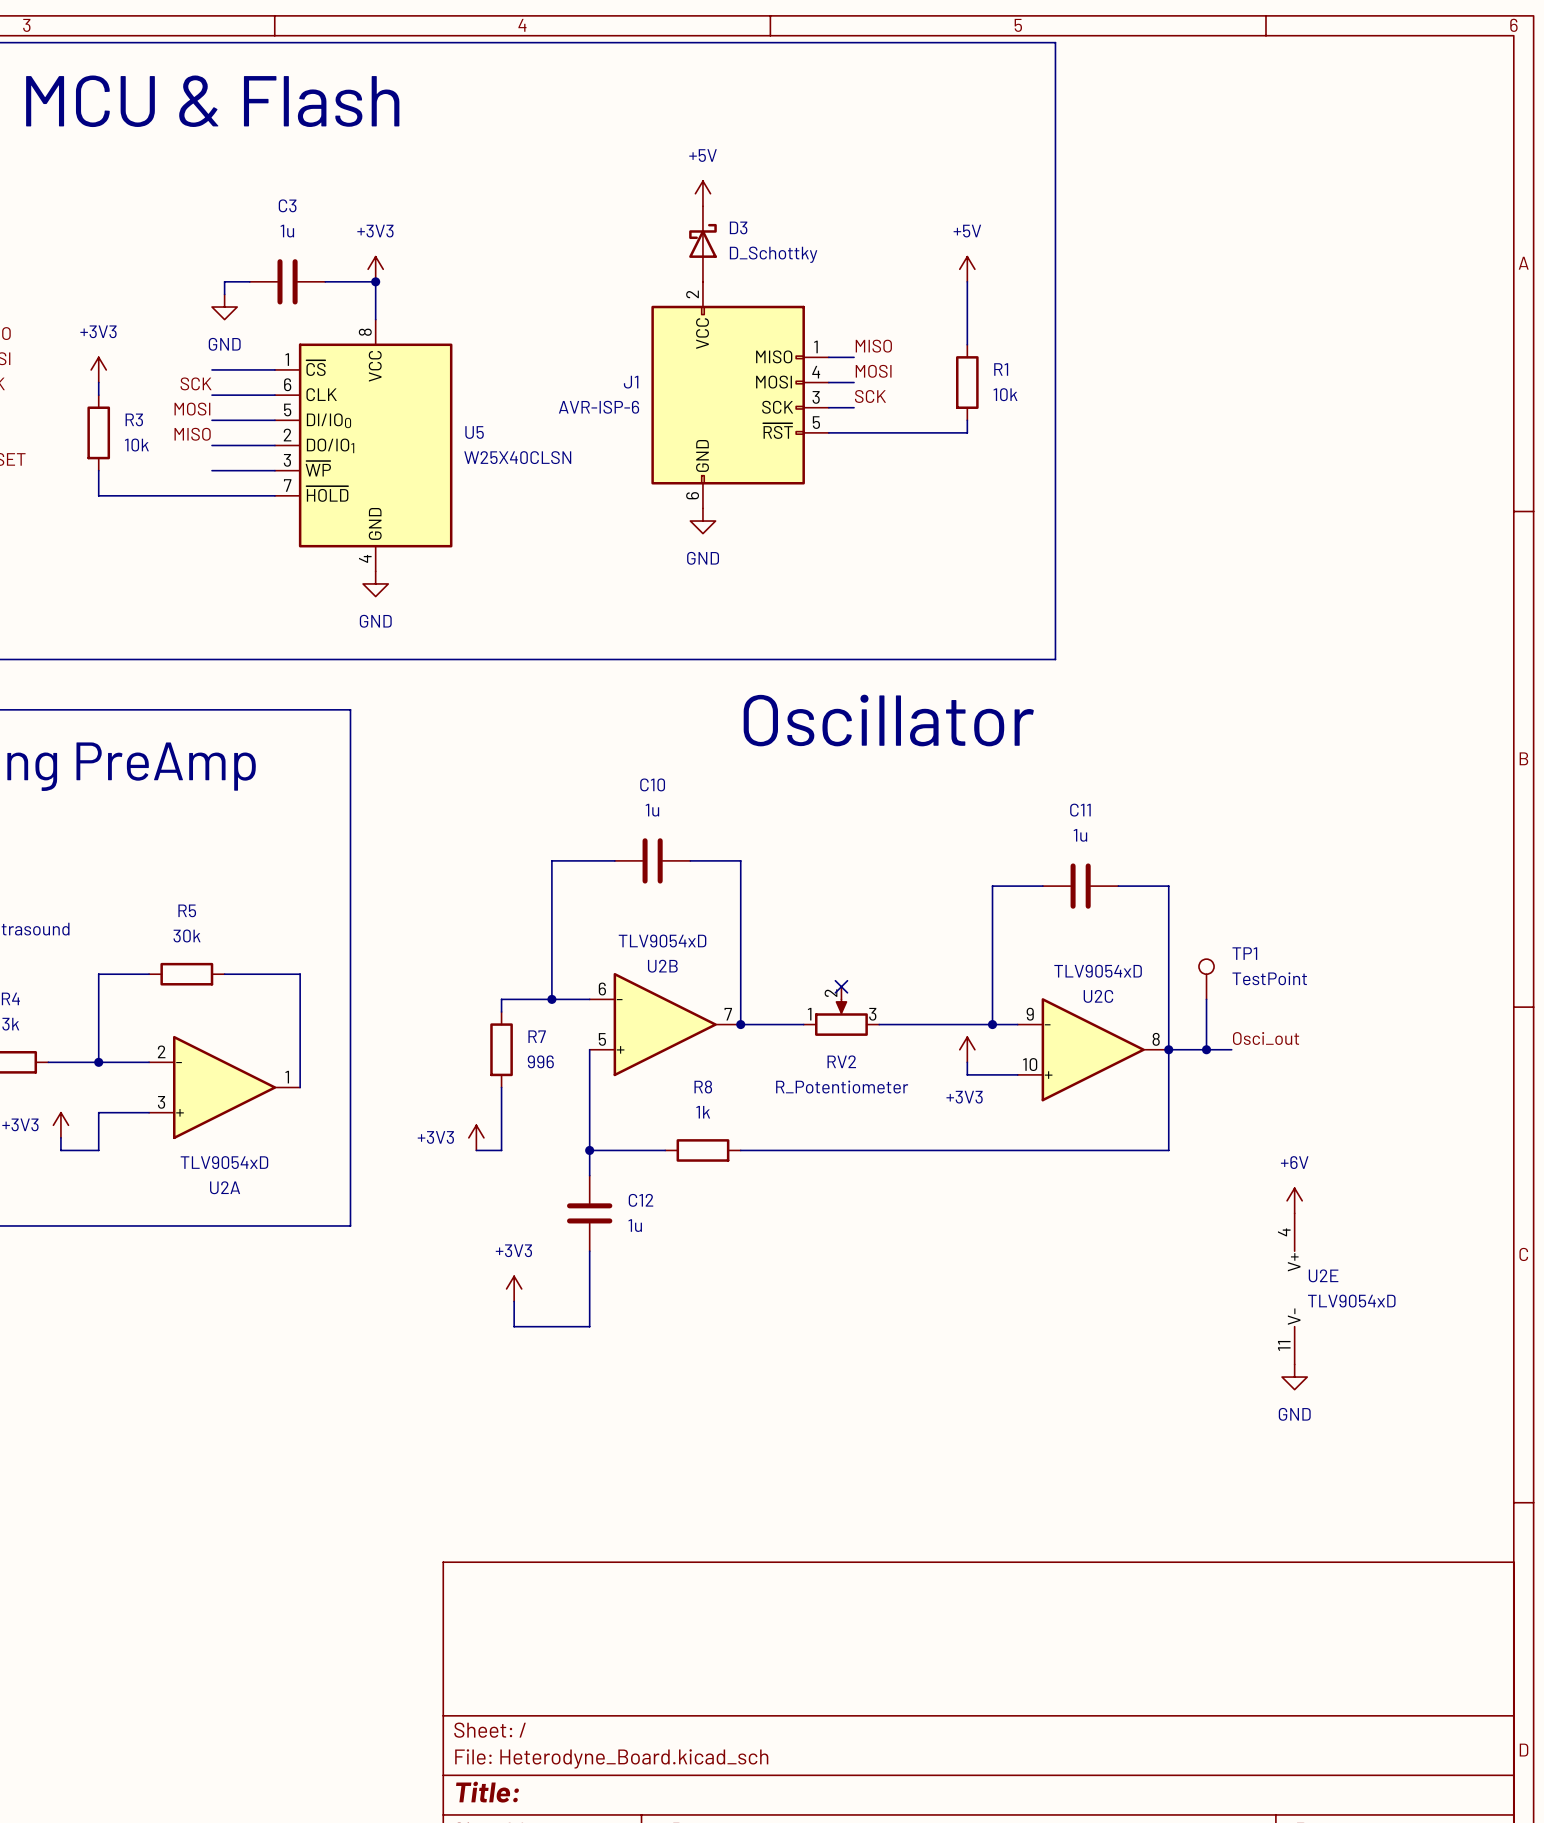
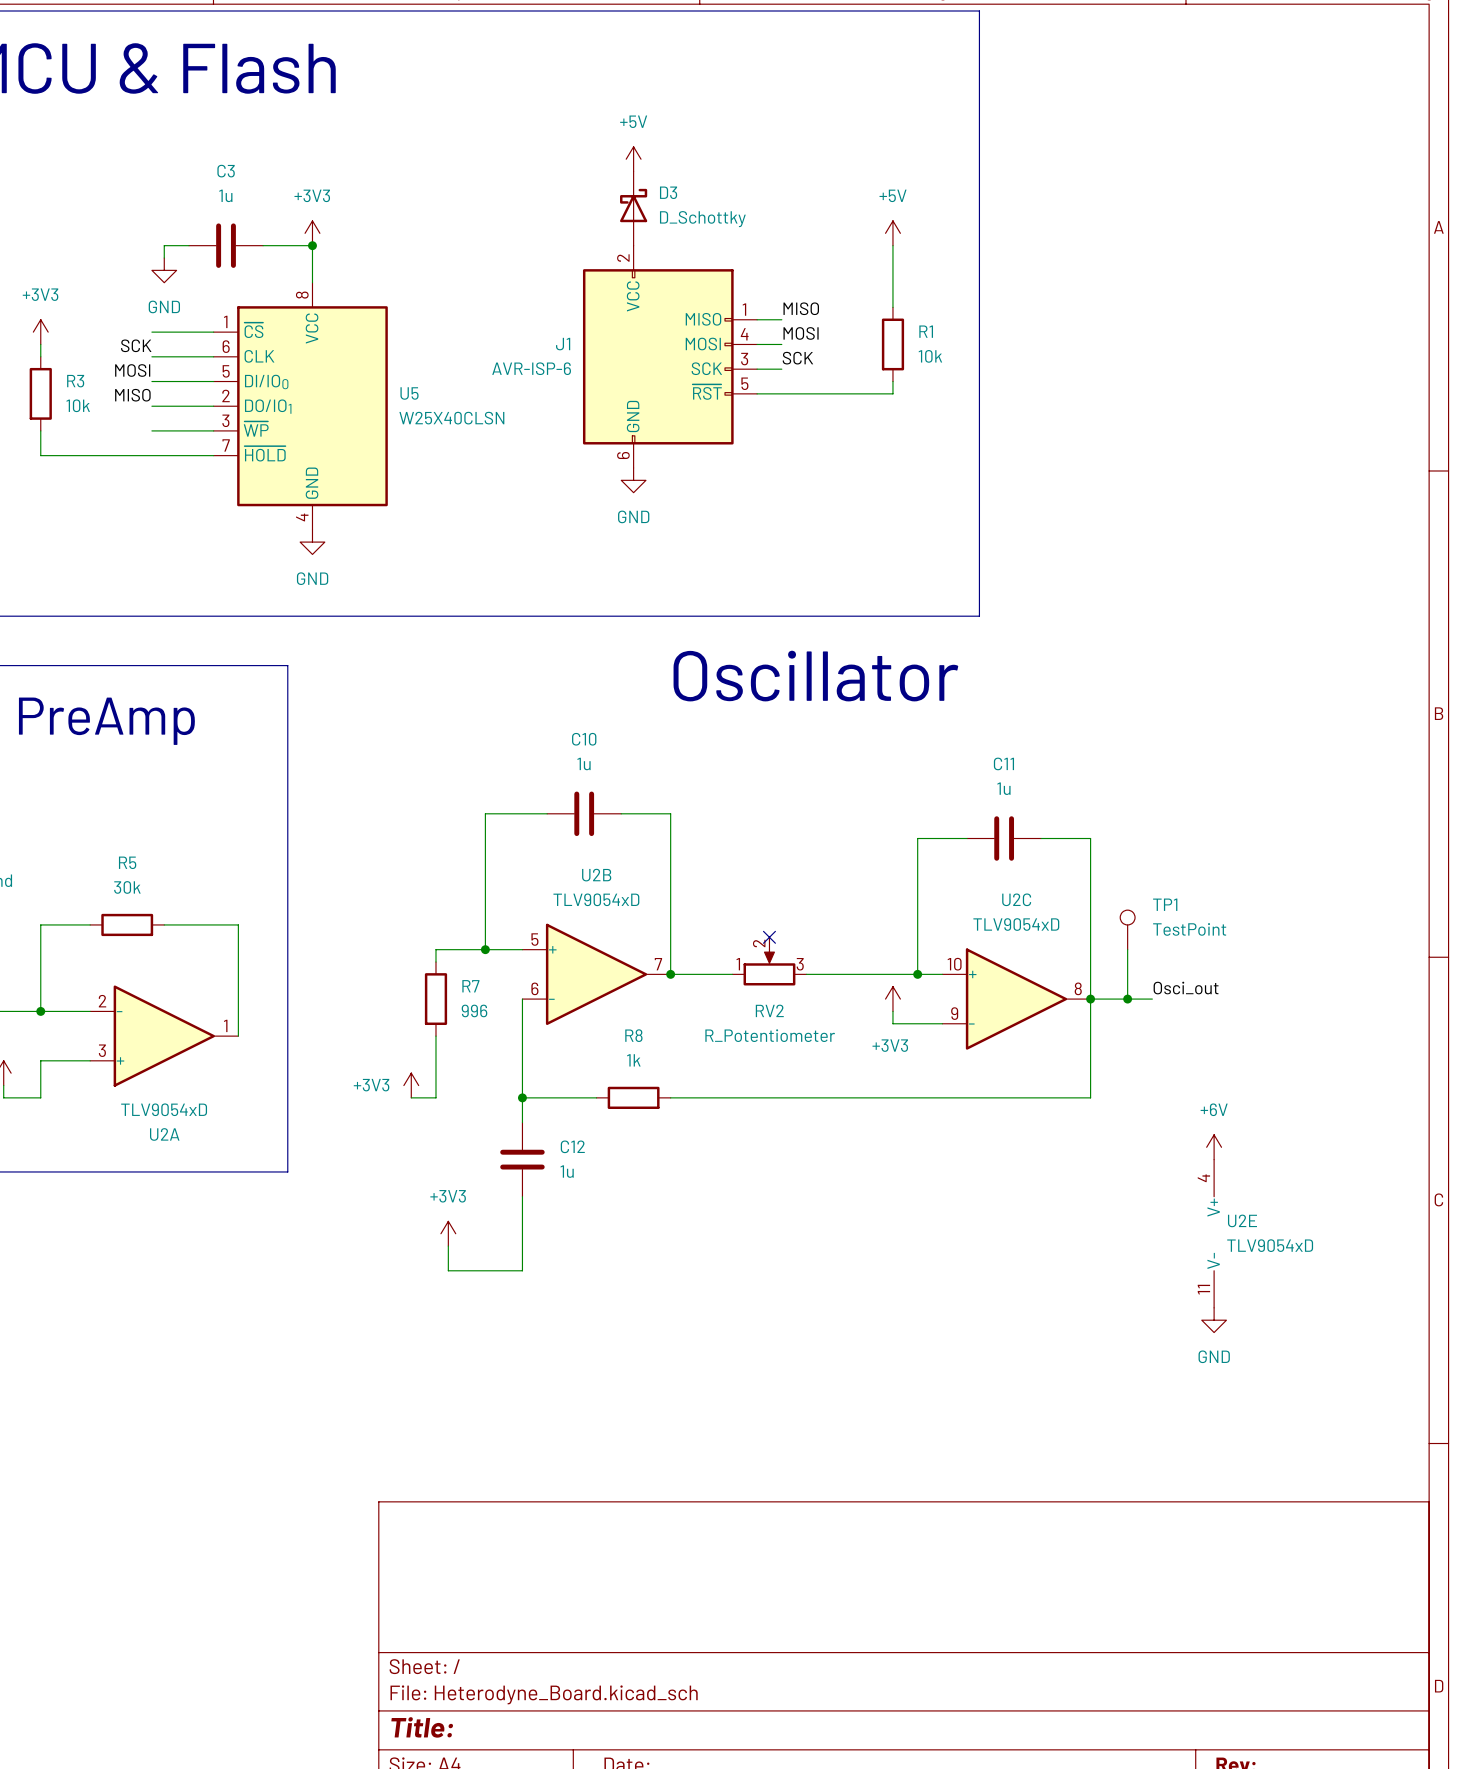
U2B name position: U2B (662, 966) -> U2B (596, 875)
U2C name position: U2C (1098, 996) -> U2C (1016, 899)
U2B flip: as is (665, 1024) -> up-down (596, 974)
U2C flip: as is (1093, 1049) -> up-down (1016, 999)

